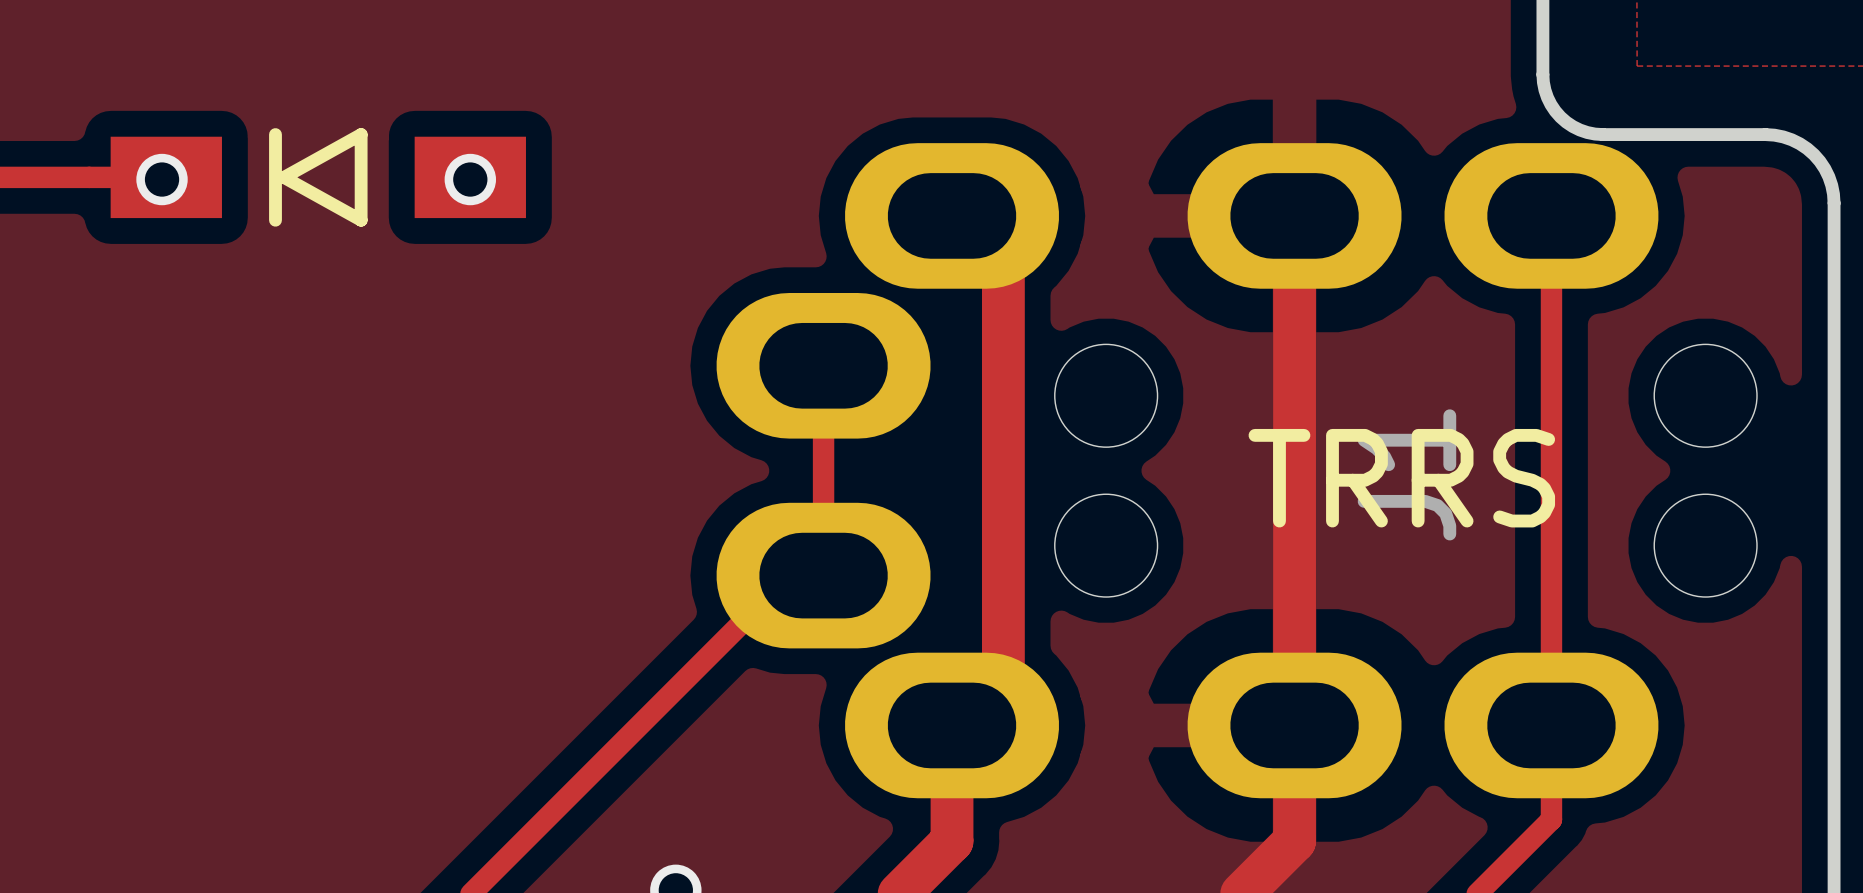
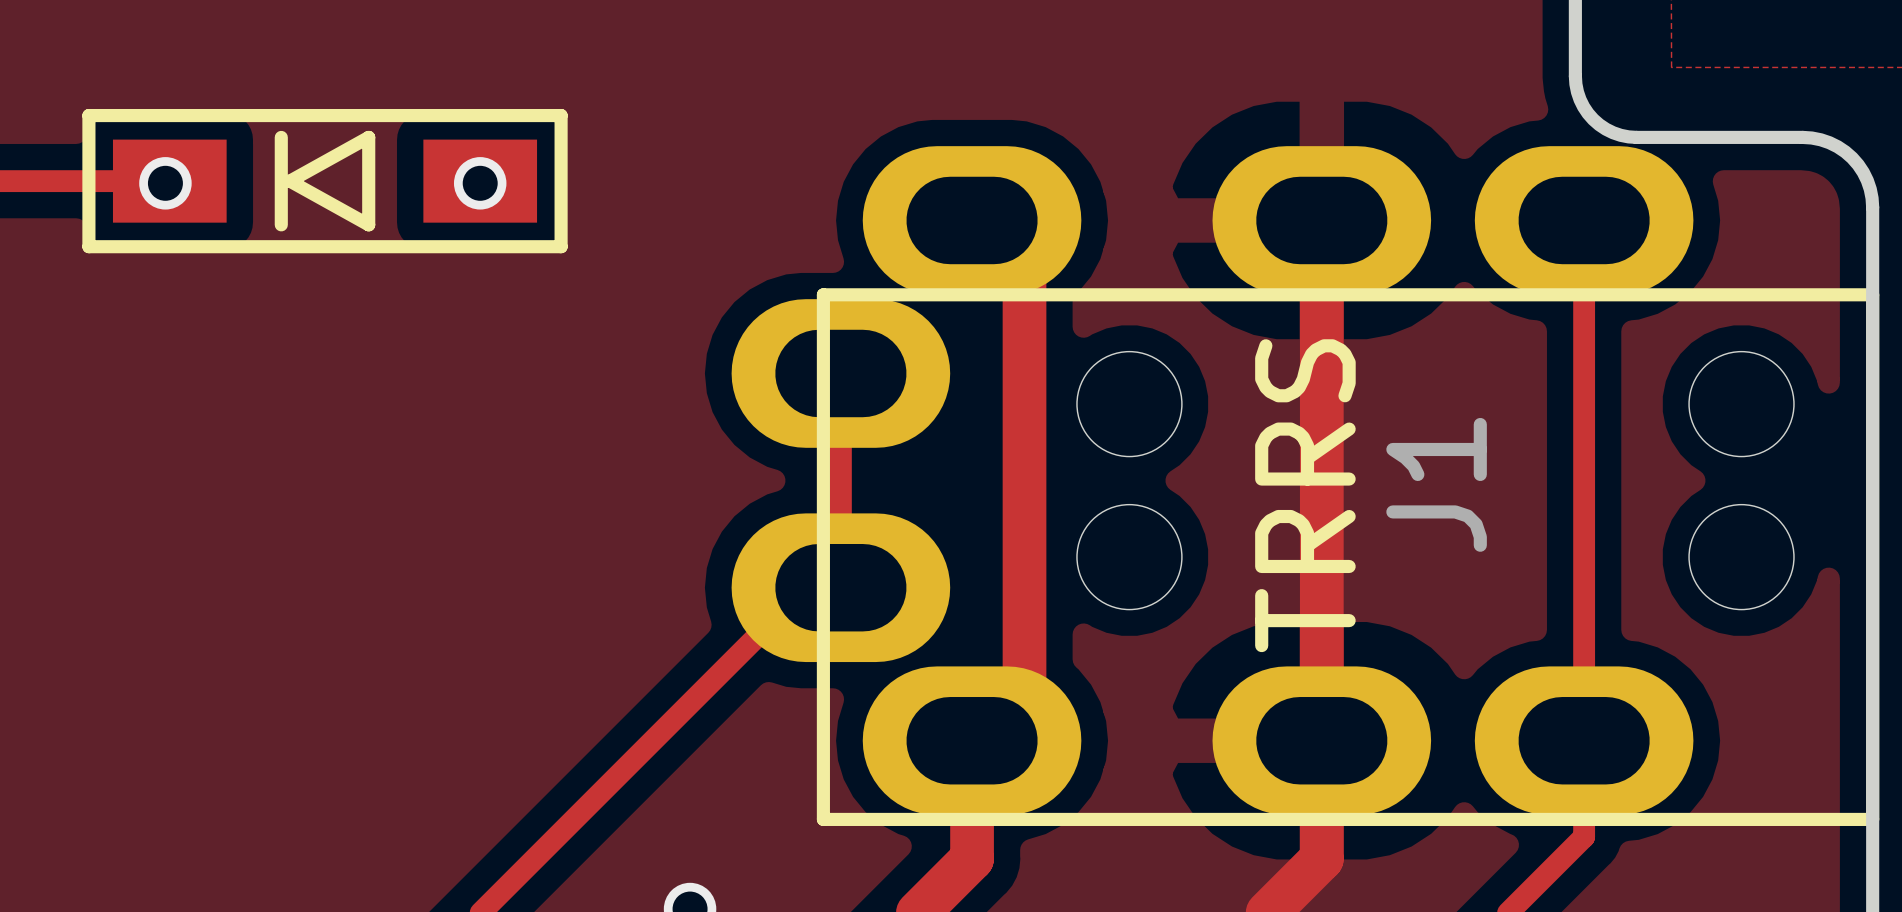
part footprint: [110, 128, 526, 227] -> [82, 108, 568, 254]
J1 footprint: [716, 143, 1758, 799] -> [731, 146, 1880, 826]

